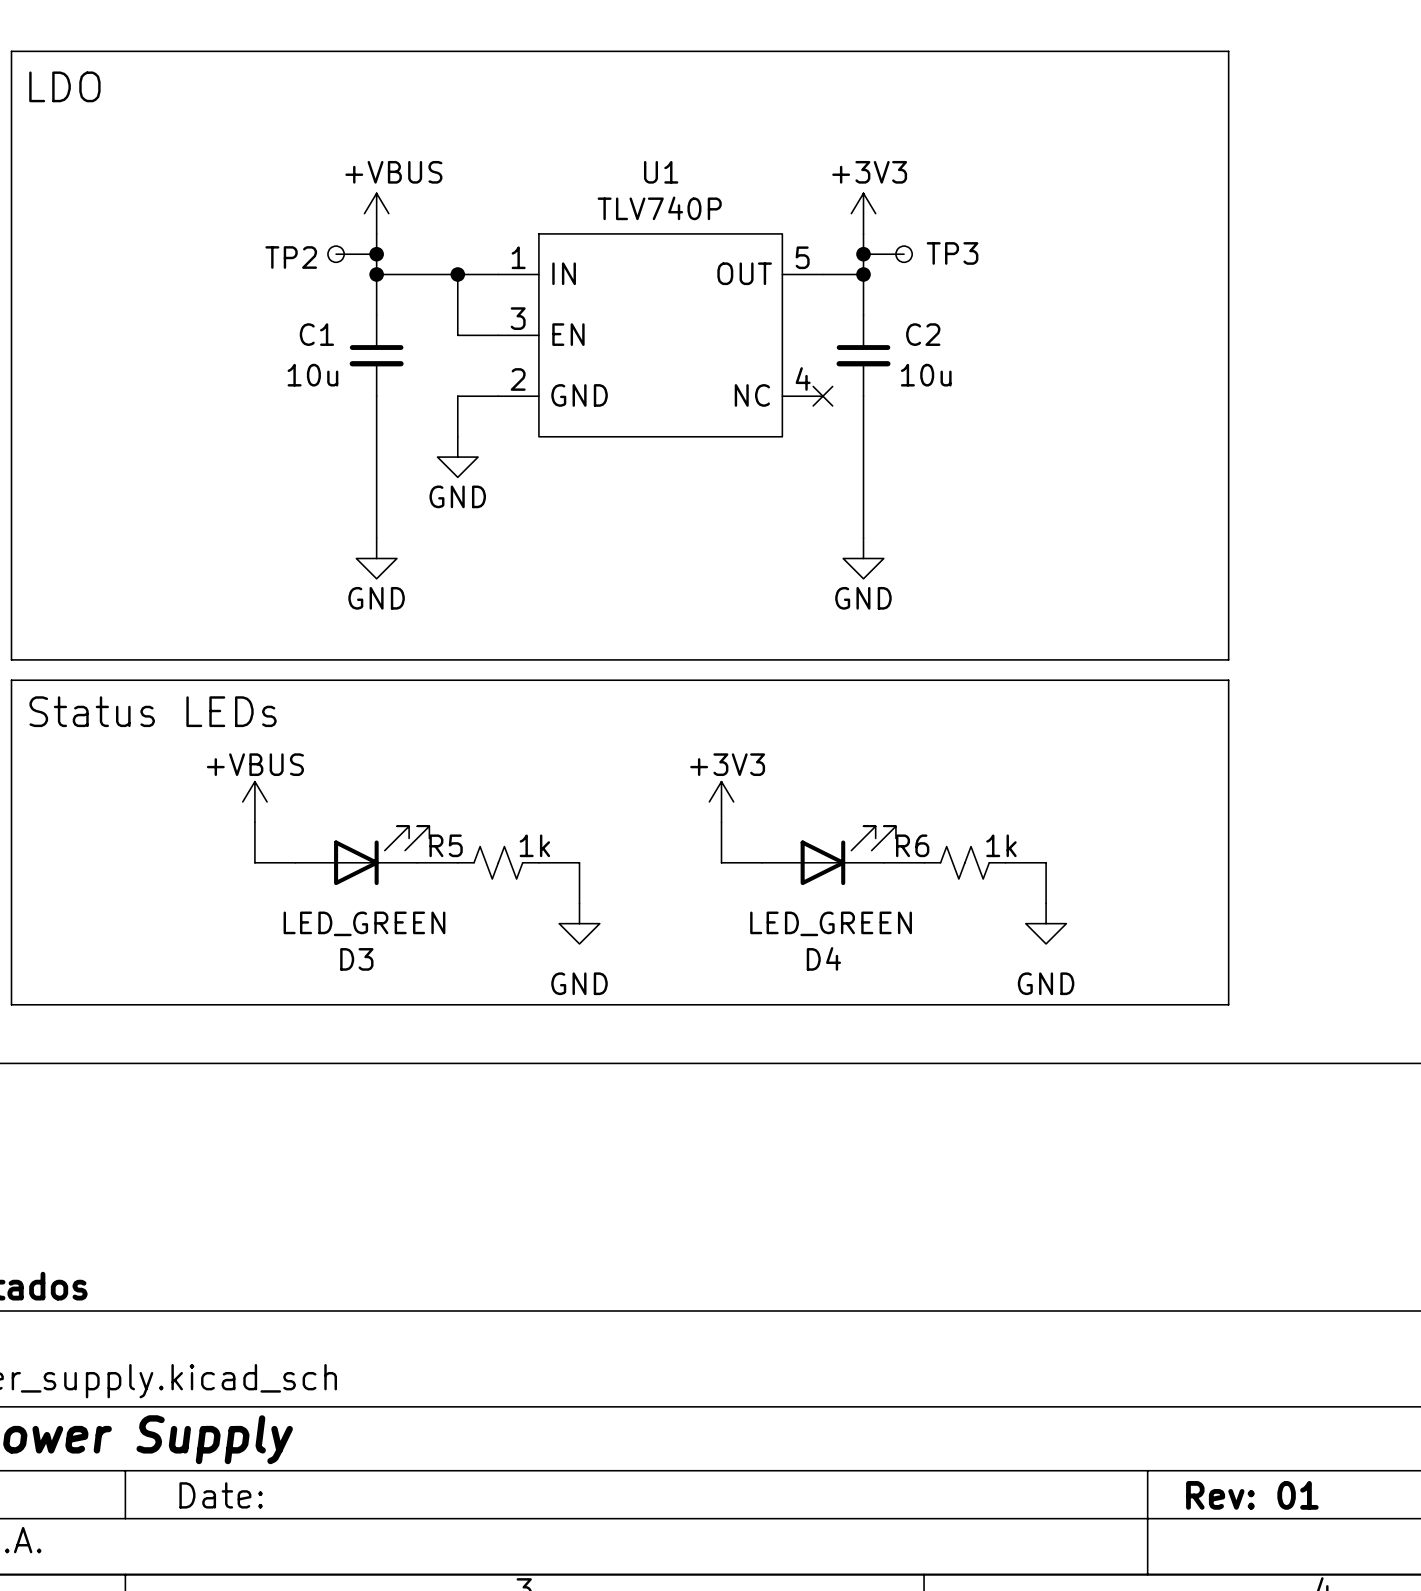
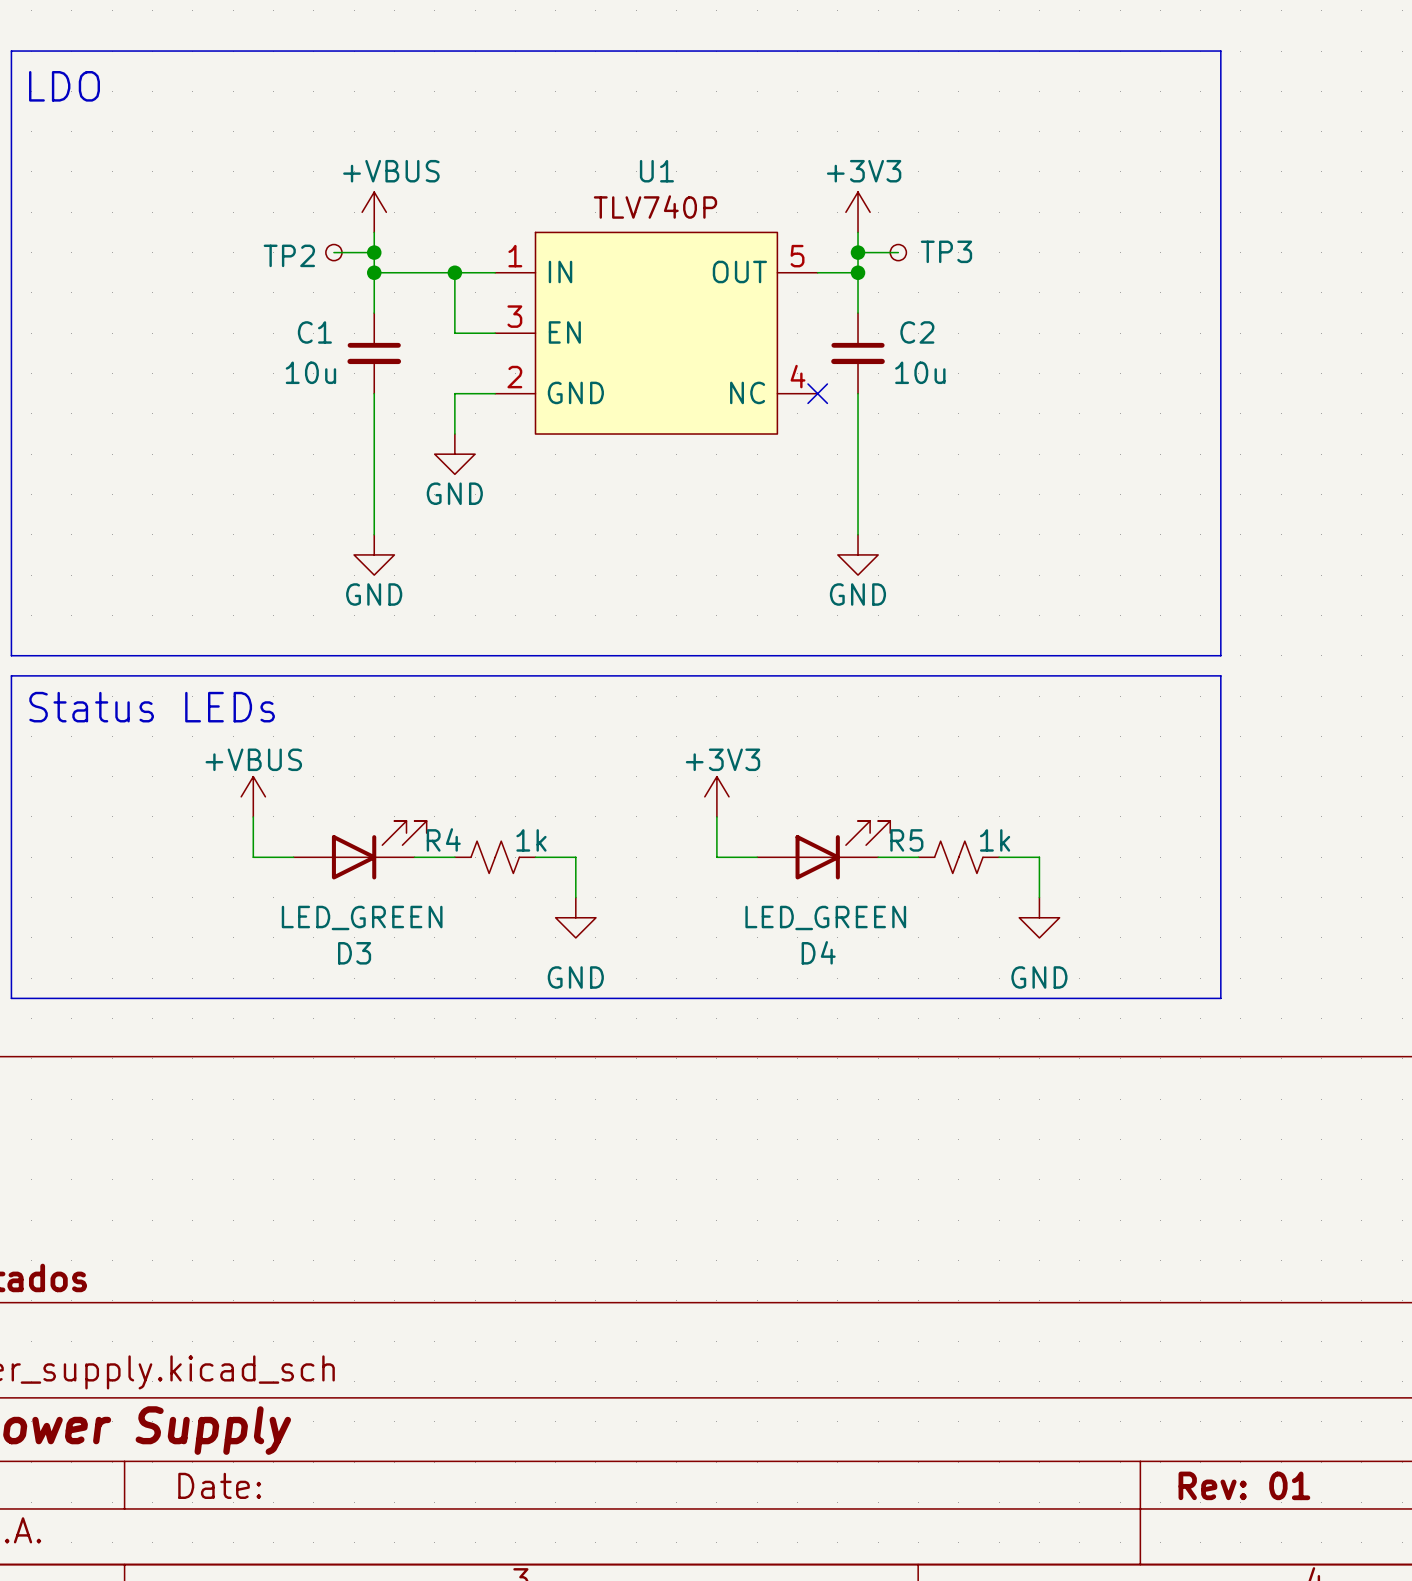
R5 name: R5 (446, 845) -> R4 (443, 839)
R6 name: R6 (912, 845) -> R5 (906, 840)

